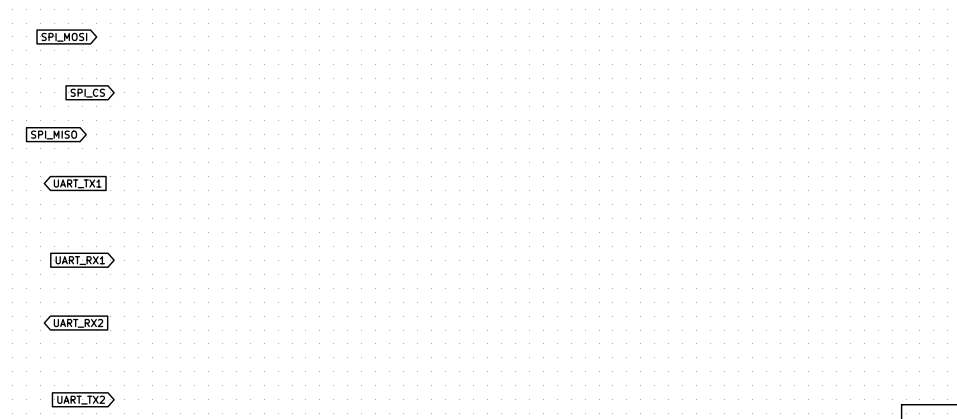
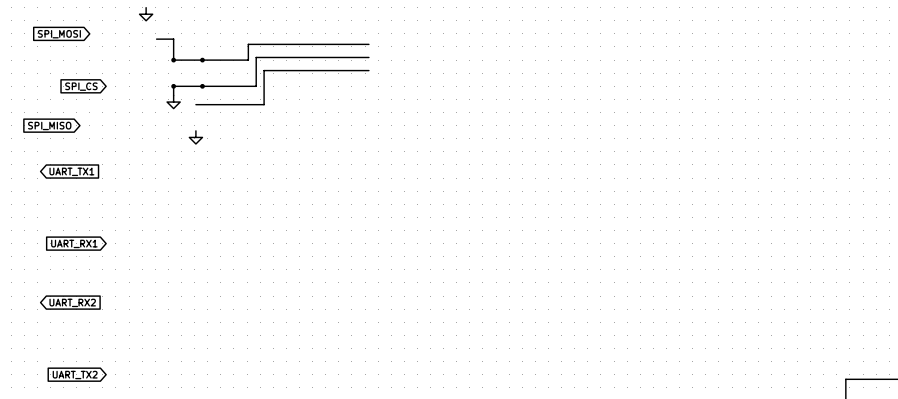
power symbol: none -> (146, 14)
wire: none -> (156, 39) (173, 39) (173, 60) (248, 60) (248, 44) (368, 44)
wire: none -> (368, 57) (256, 57) (256, 86) (173, 86) (173, 95)
junction: none -> (173, 60)
junction: none -> (202, 60)
wire: none -> (368, 70) (264, 70) (264, 104) (195, 104)
junction: none -> (173, 86)
junction: none -> (202, 86)
power symbol: none -> (173, 102)
power symbol: none -> (195, 137)

